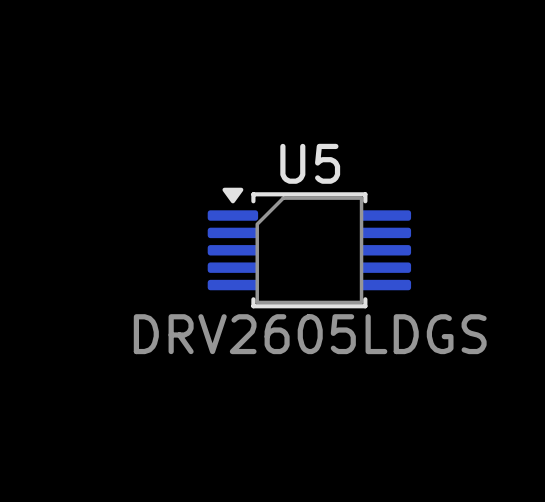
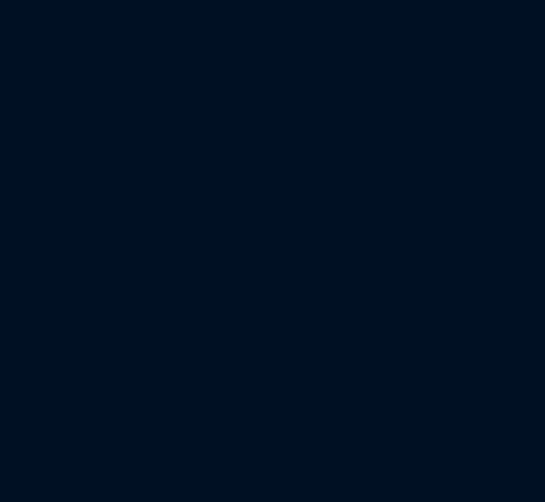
U5: DRV2605LDGS (309, 248) -> none

